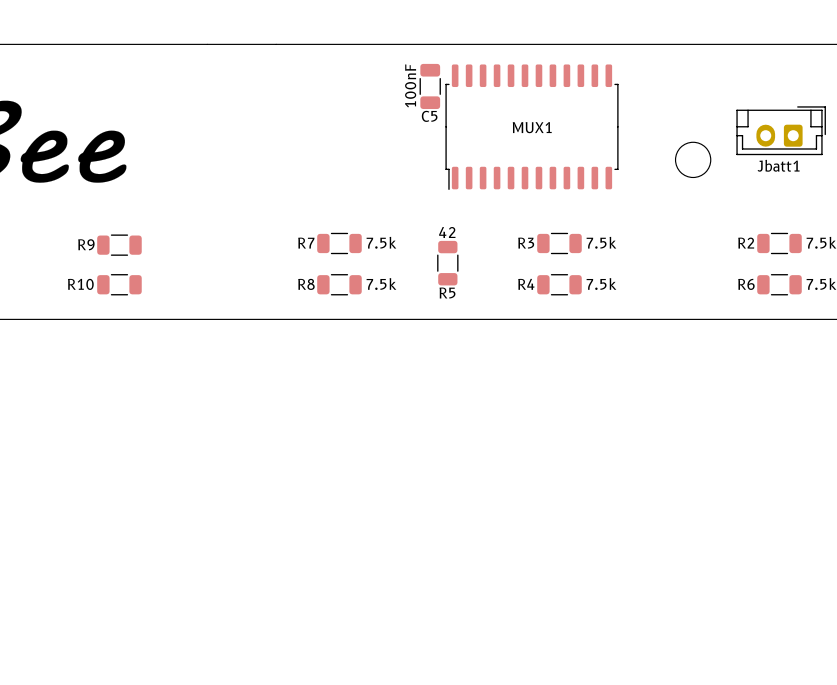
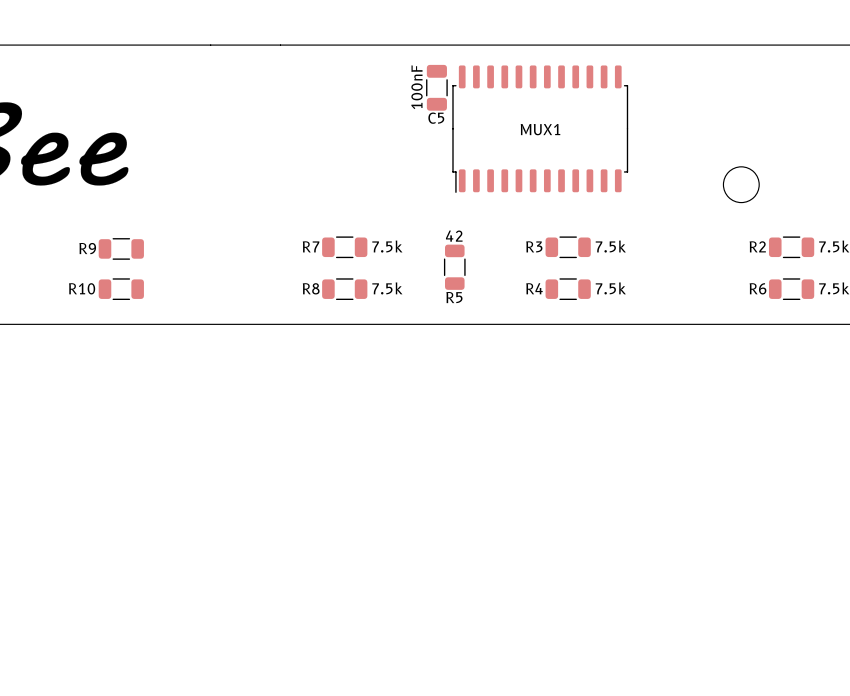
Jbatt1: (781, 130) -> none
round board edge position: (693, 159) -> (741, 184)

